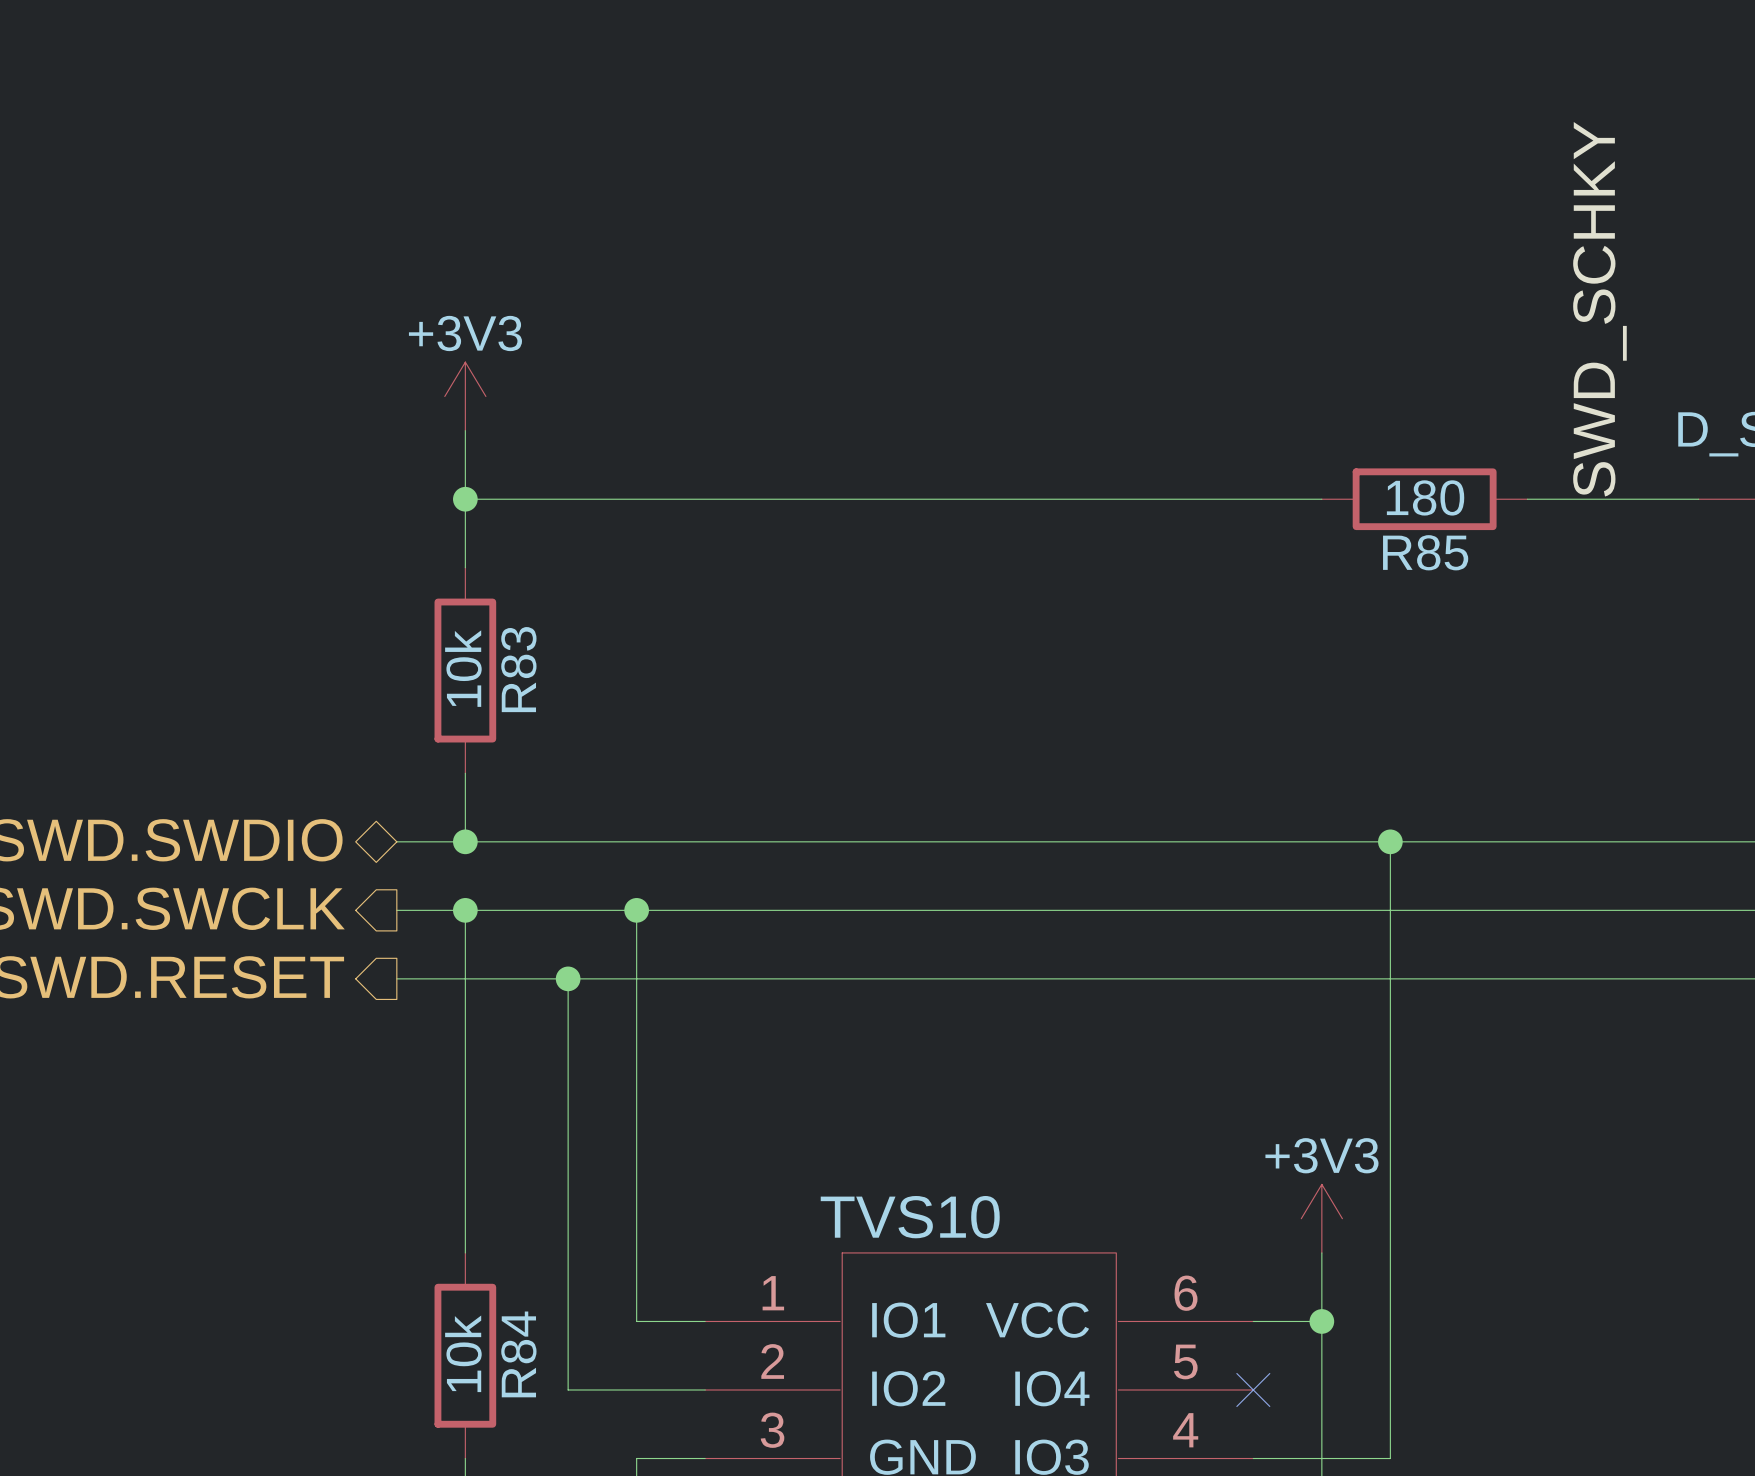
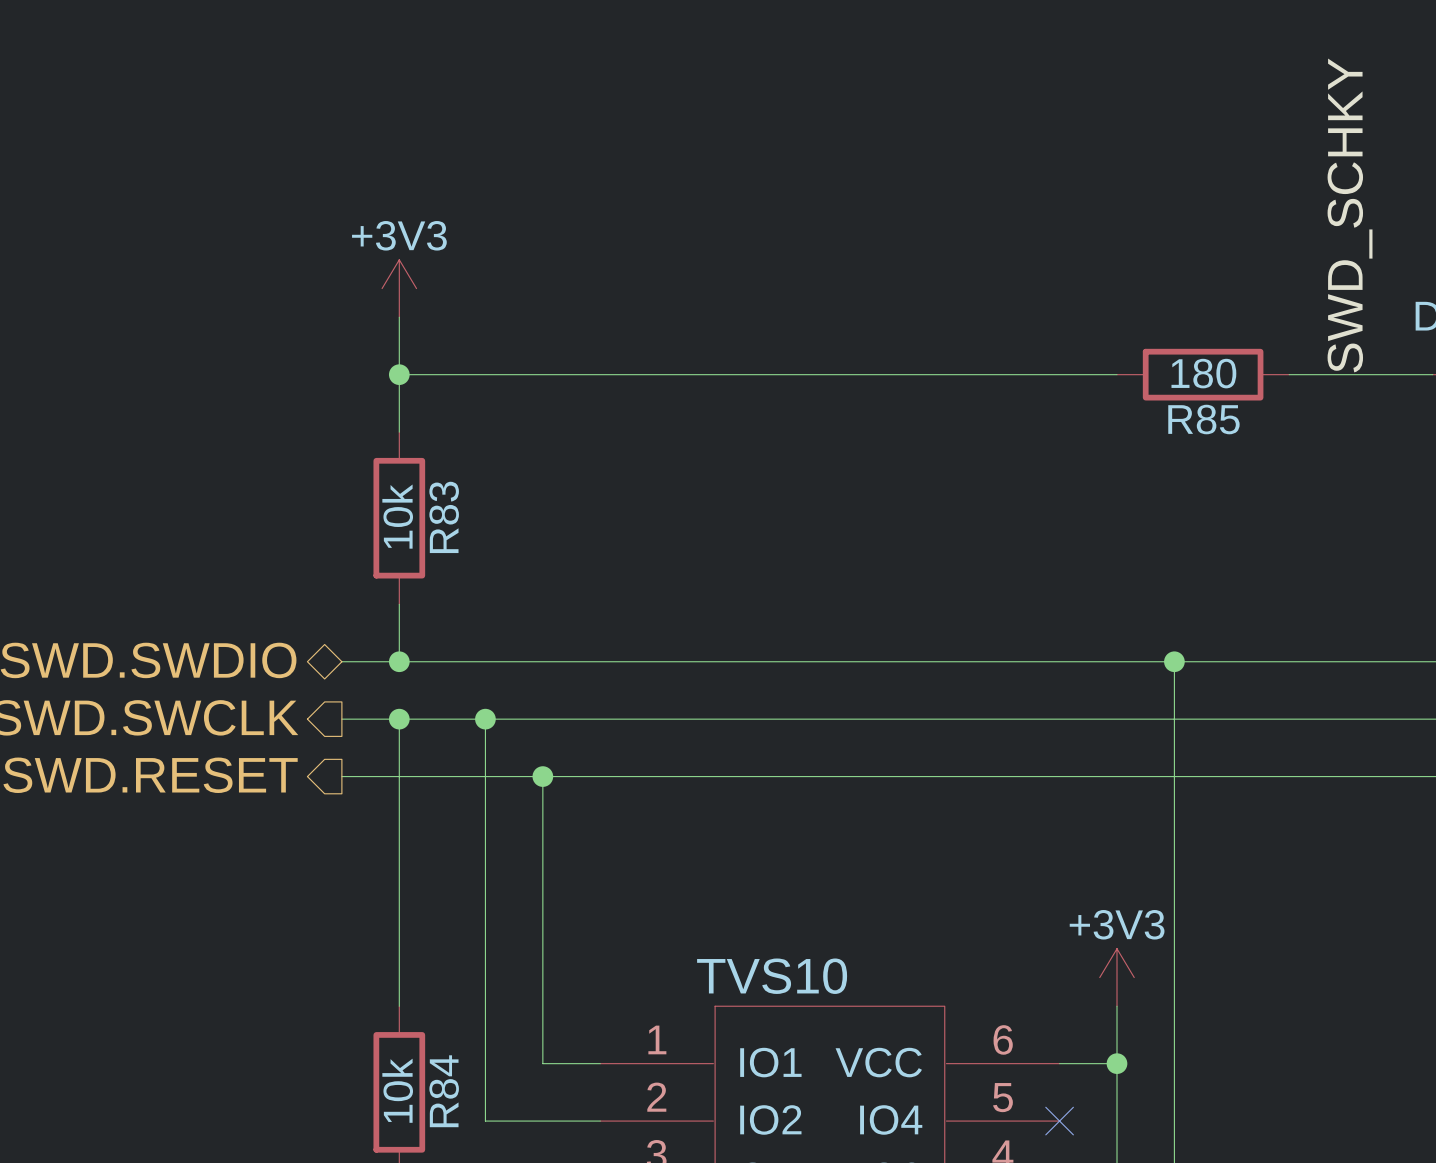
junction: none -> (485, 719)
wire: (636, 910) (636, 978) -> (485, 719) (485, 776)
junction: (636, 910) -> none
junction: (568, 978) -> none
junction: none -> (542, 776)

